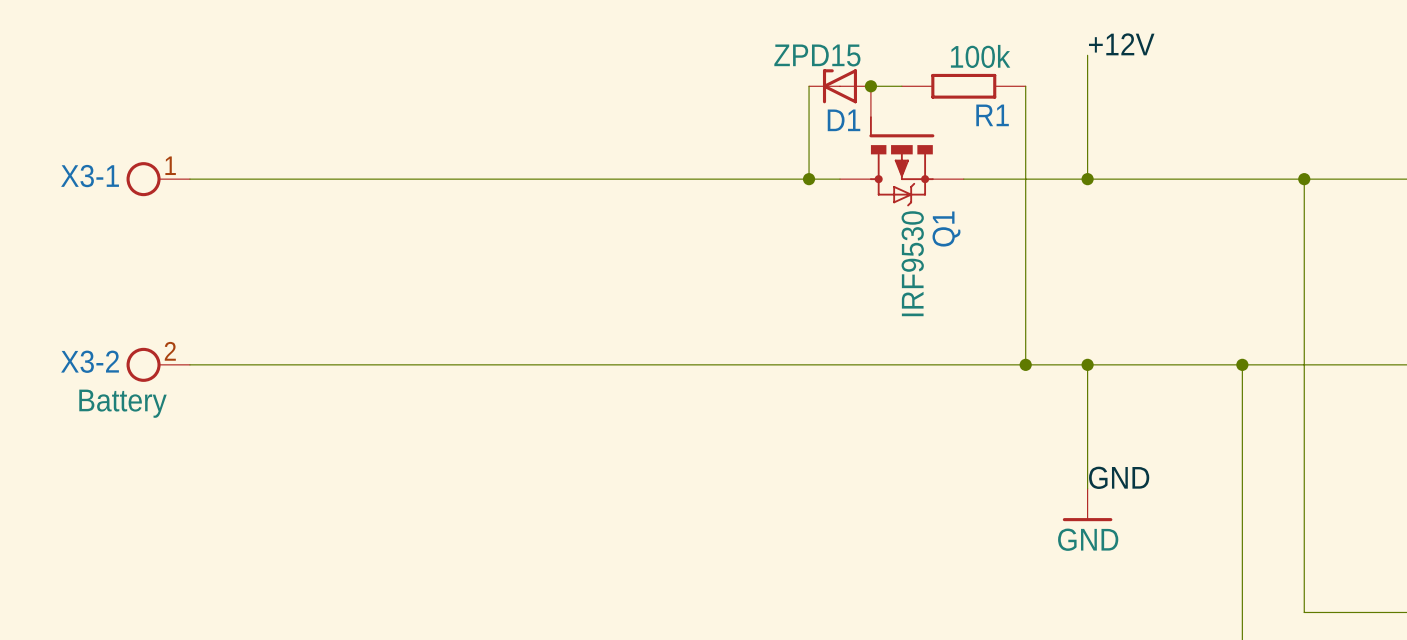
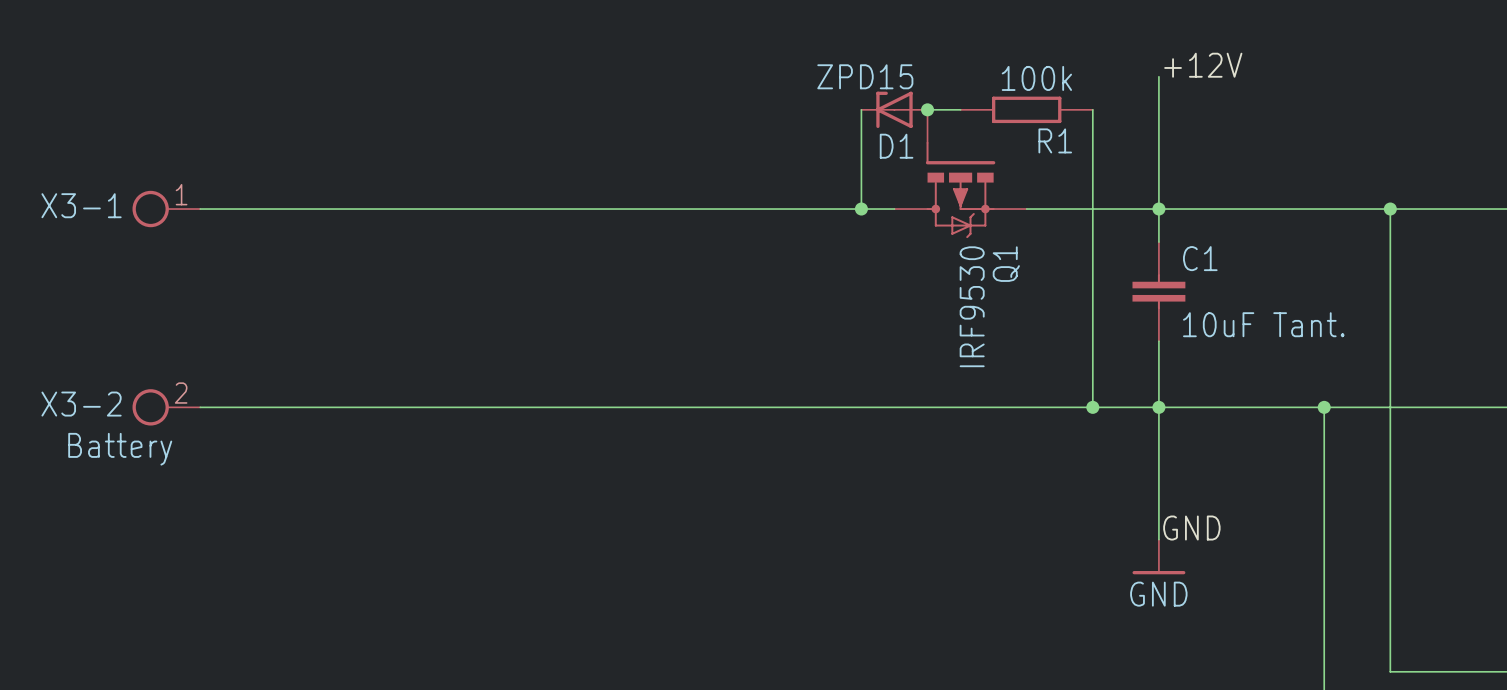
wire: none -> (1158, 209) (1158, 242)
C1: none -> 10uF Tant. (1158, 291)
wire: none -> (1158, 341) (1158, 407)

